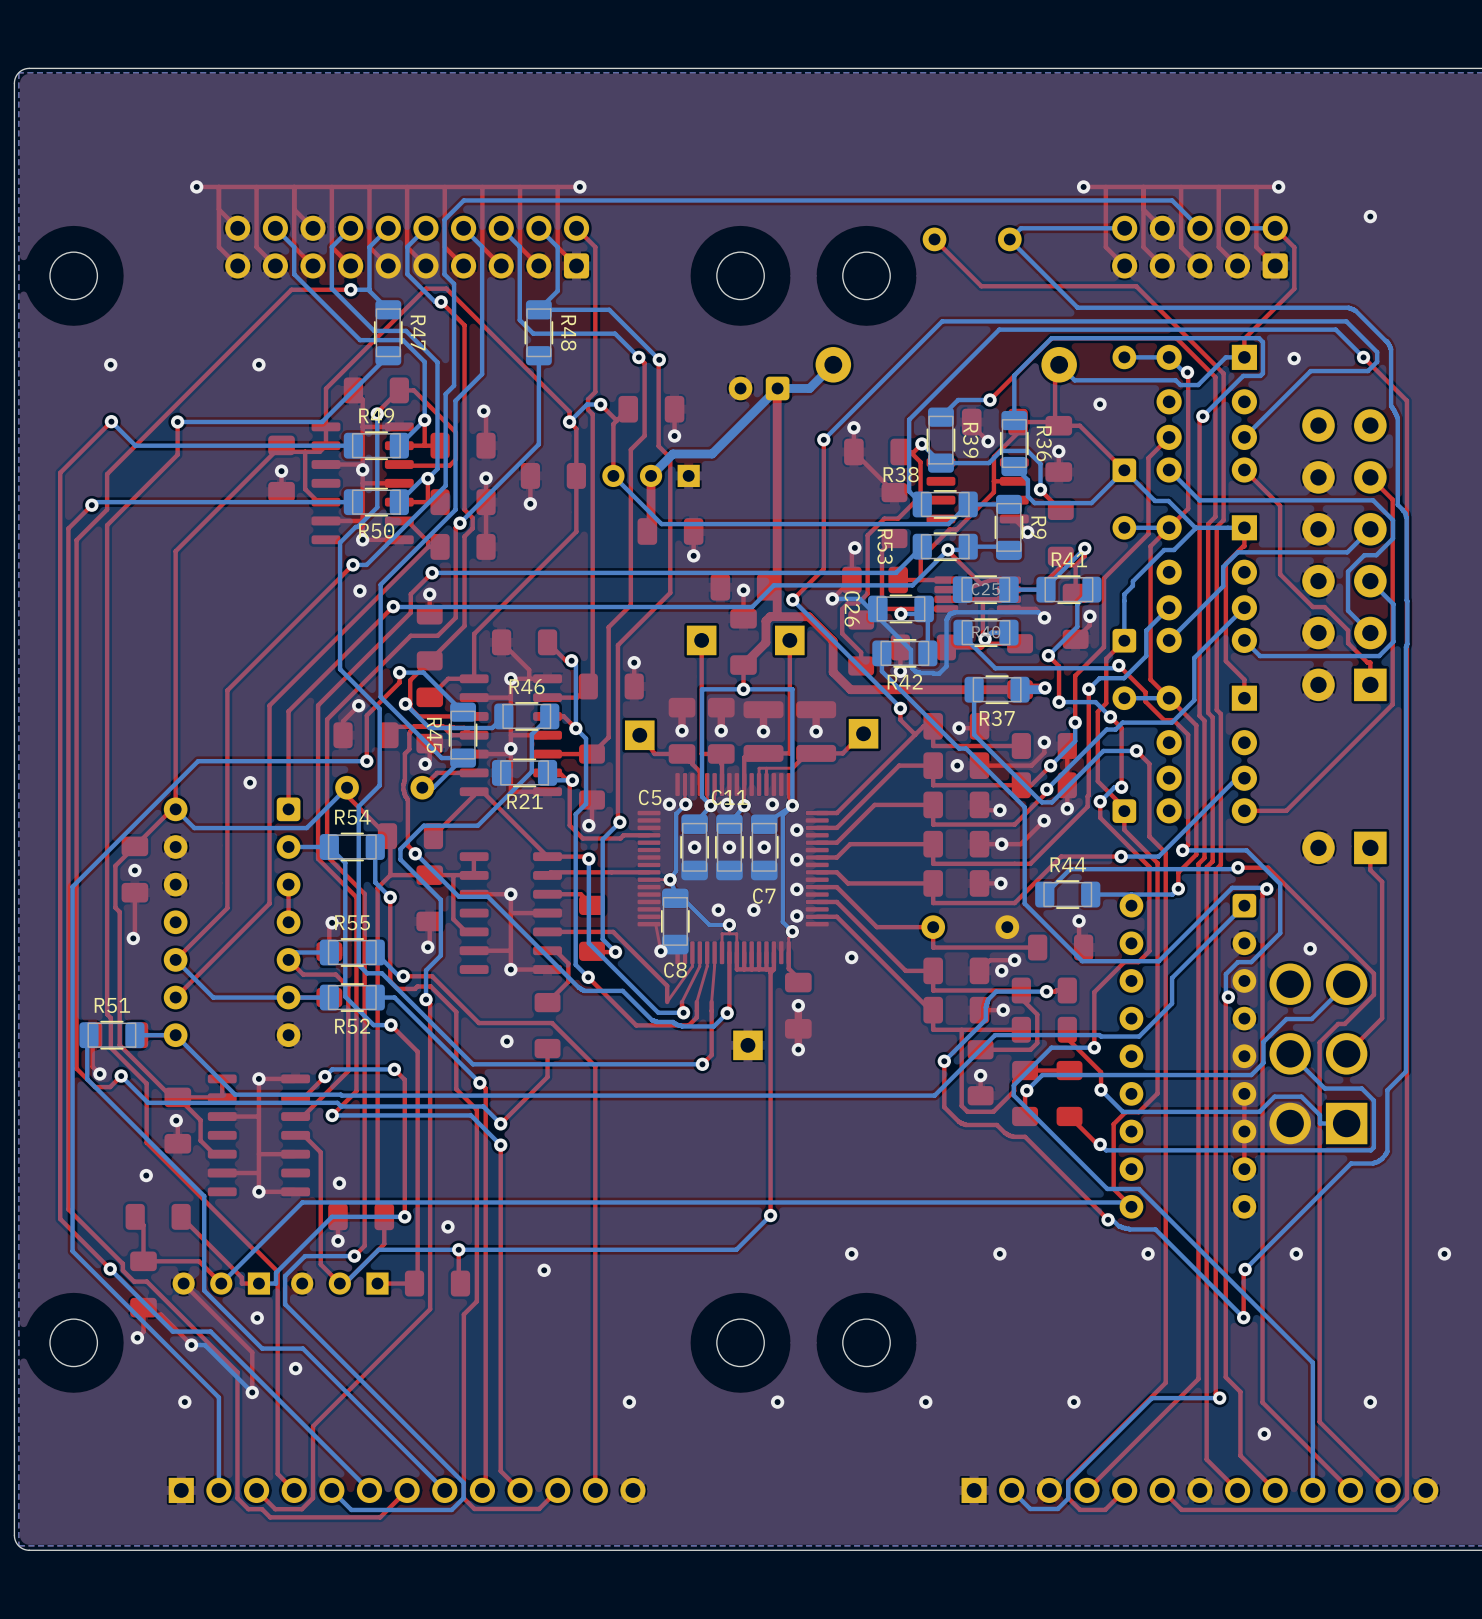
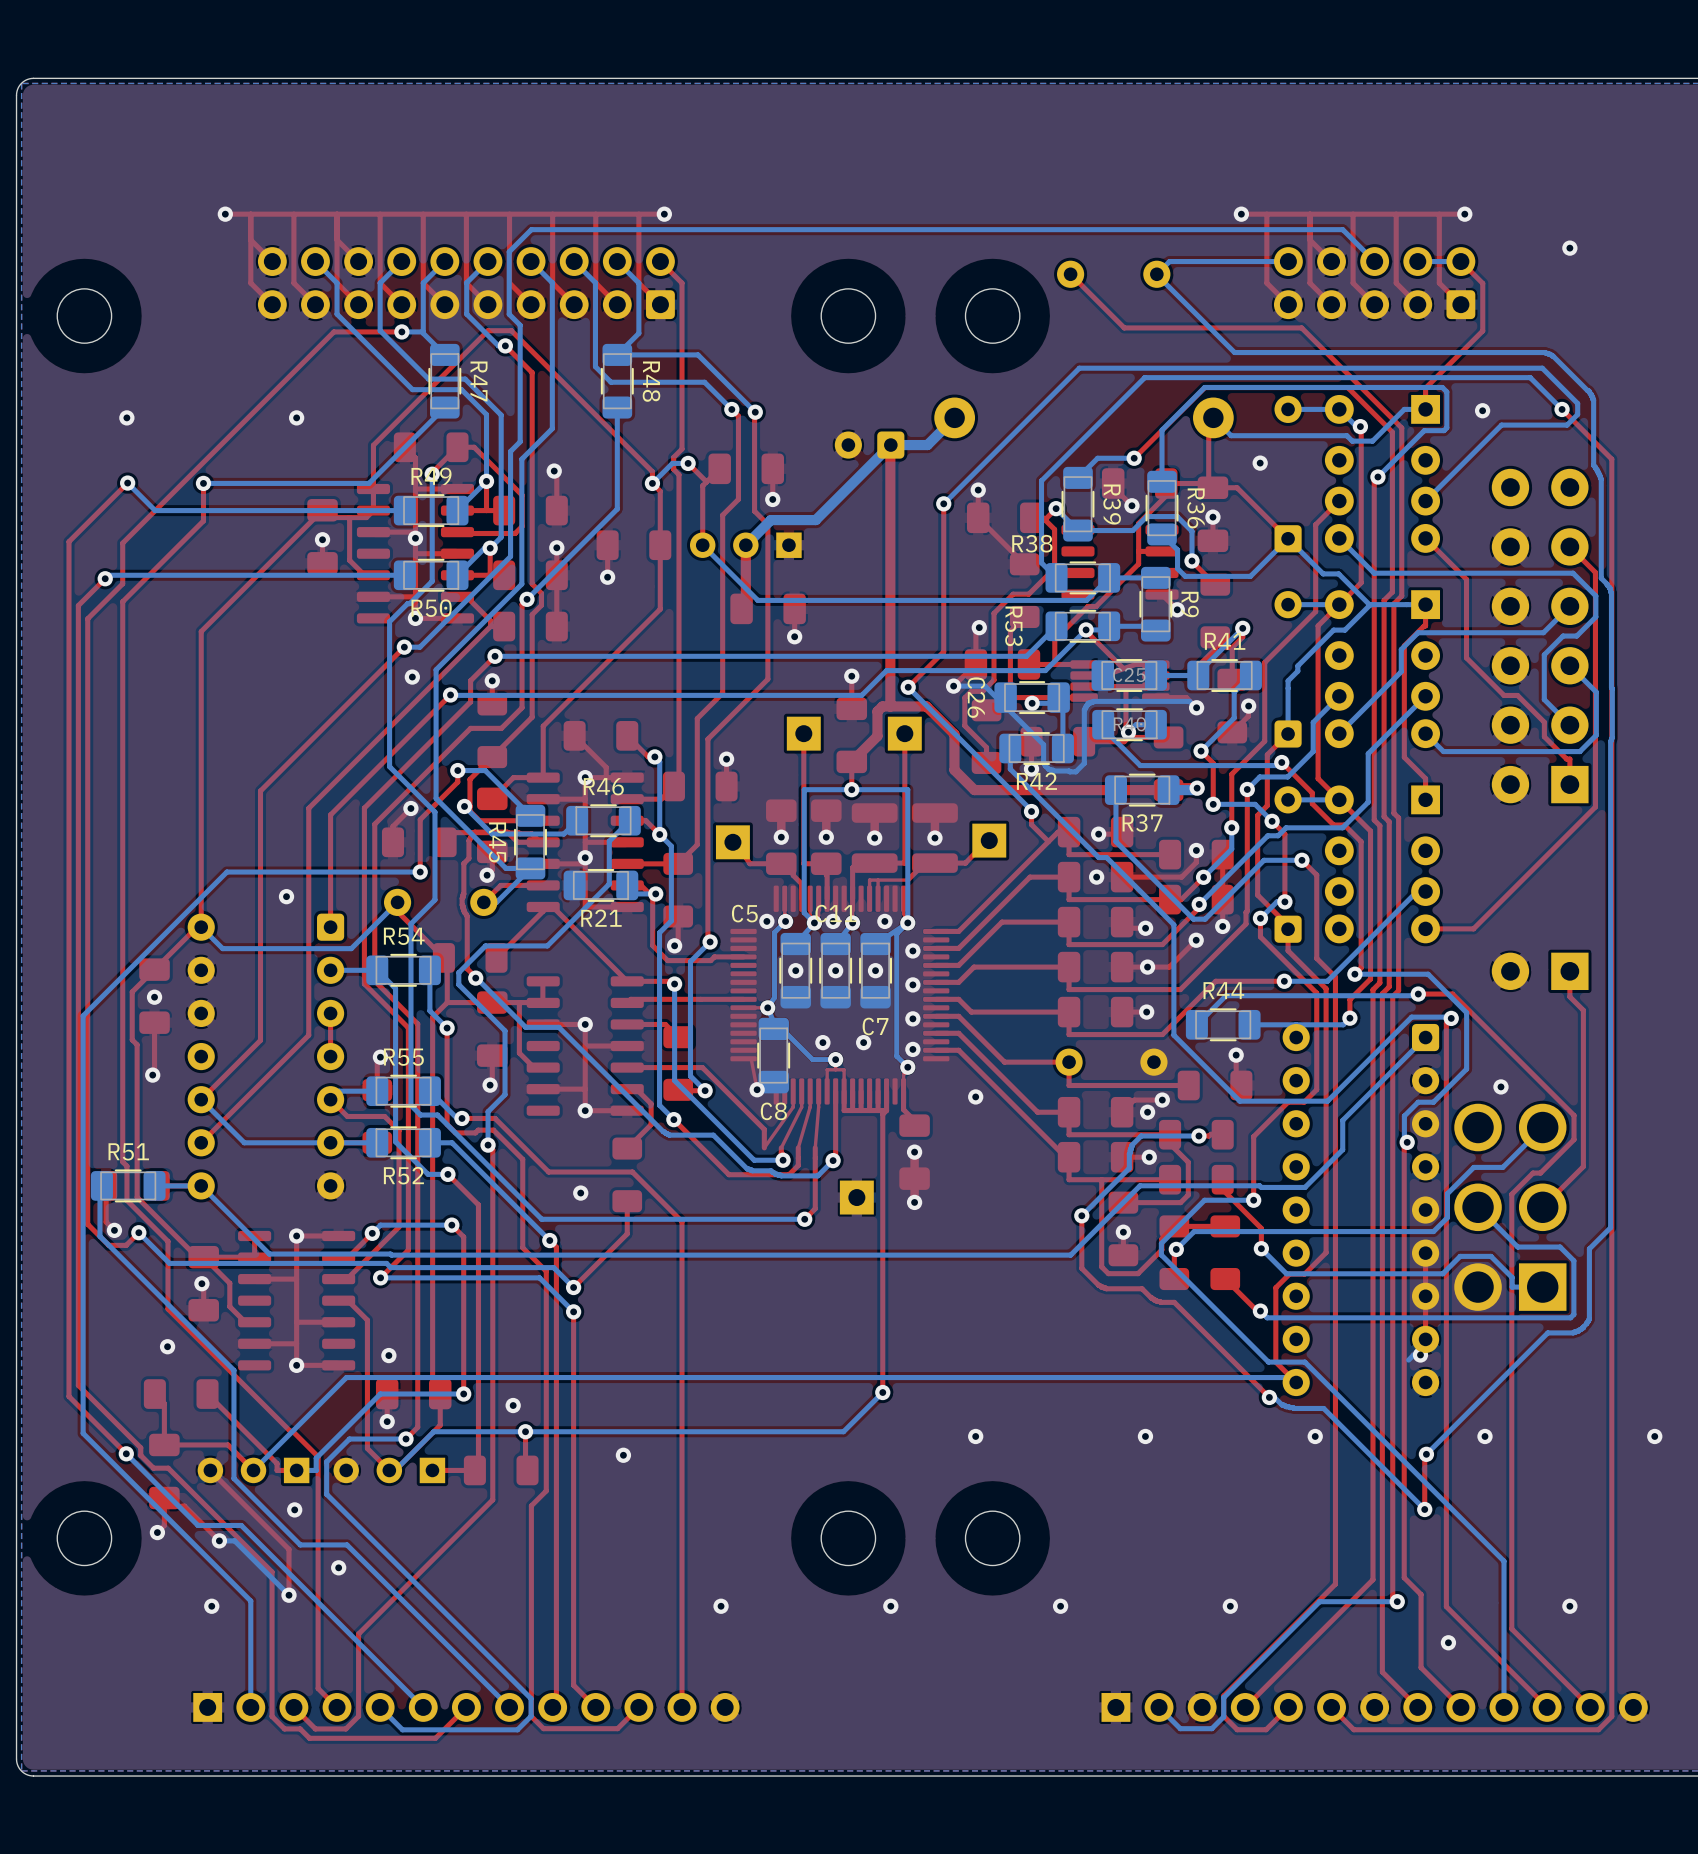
part: (743, 587) -> none
bottom track: none -> (1420, 1355) (1413, 1355) (1408, 1360)
via: none -> (1420, 1355)

